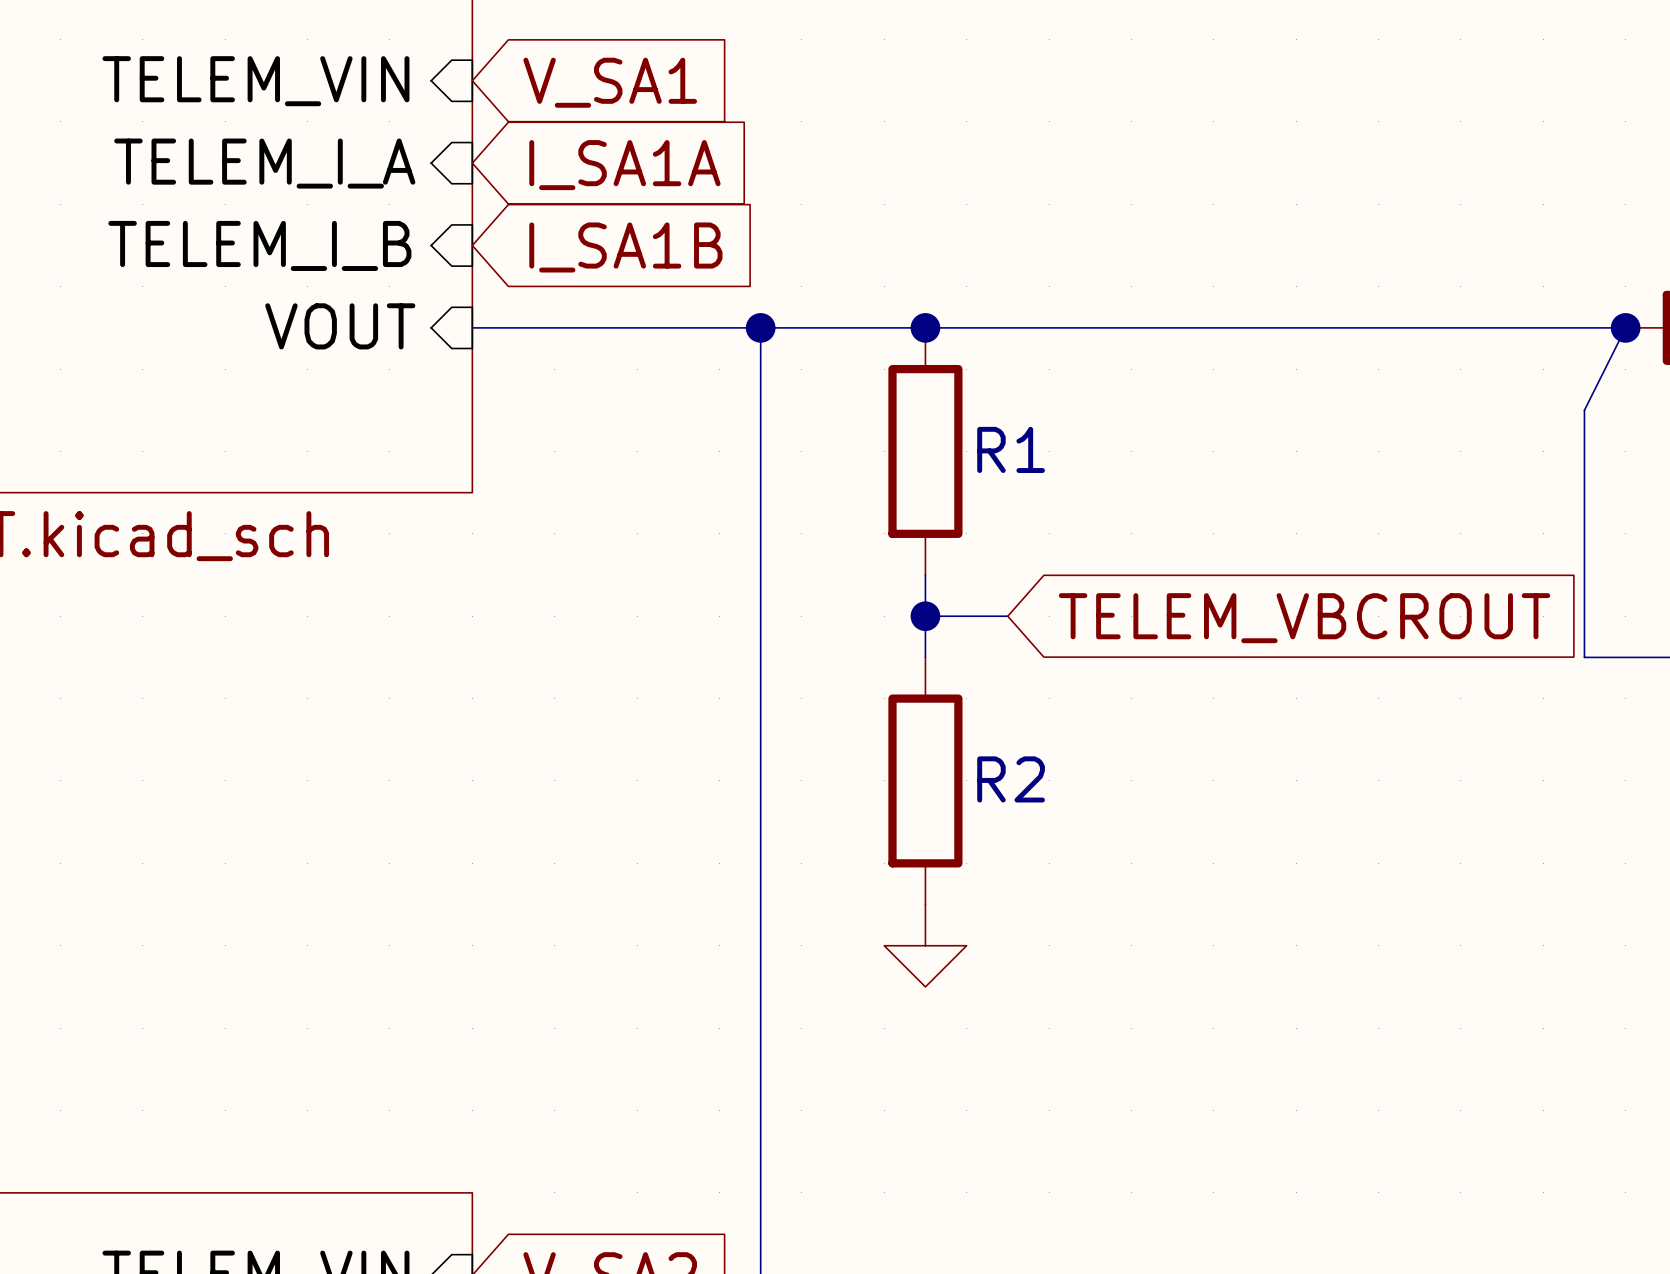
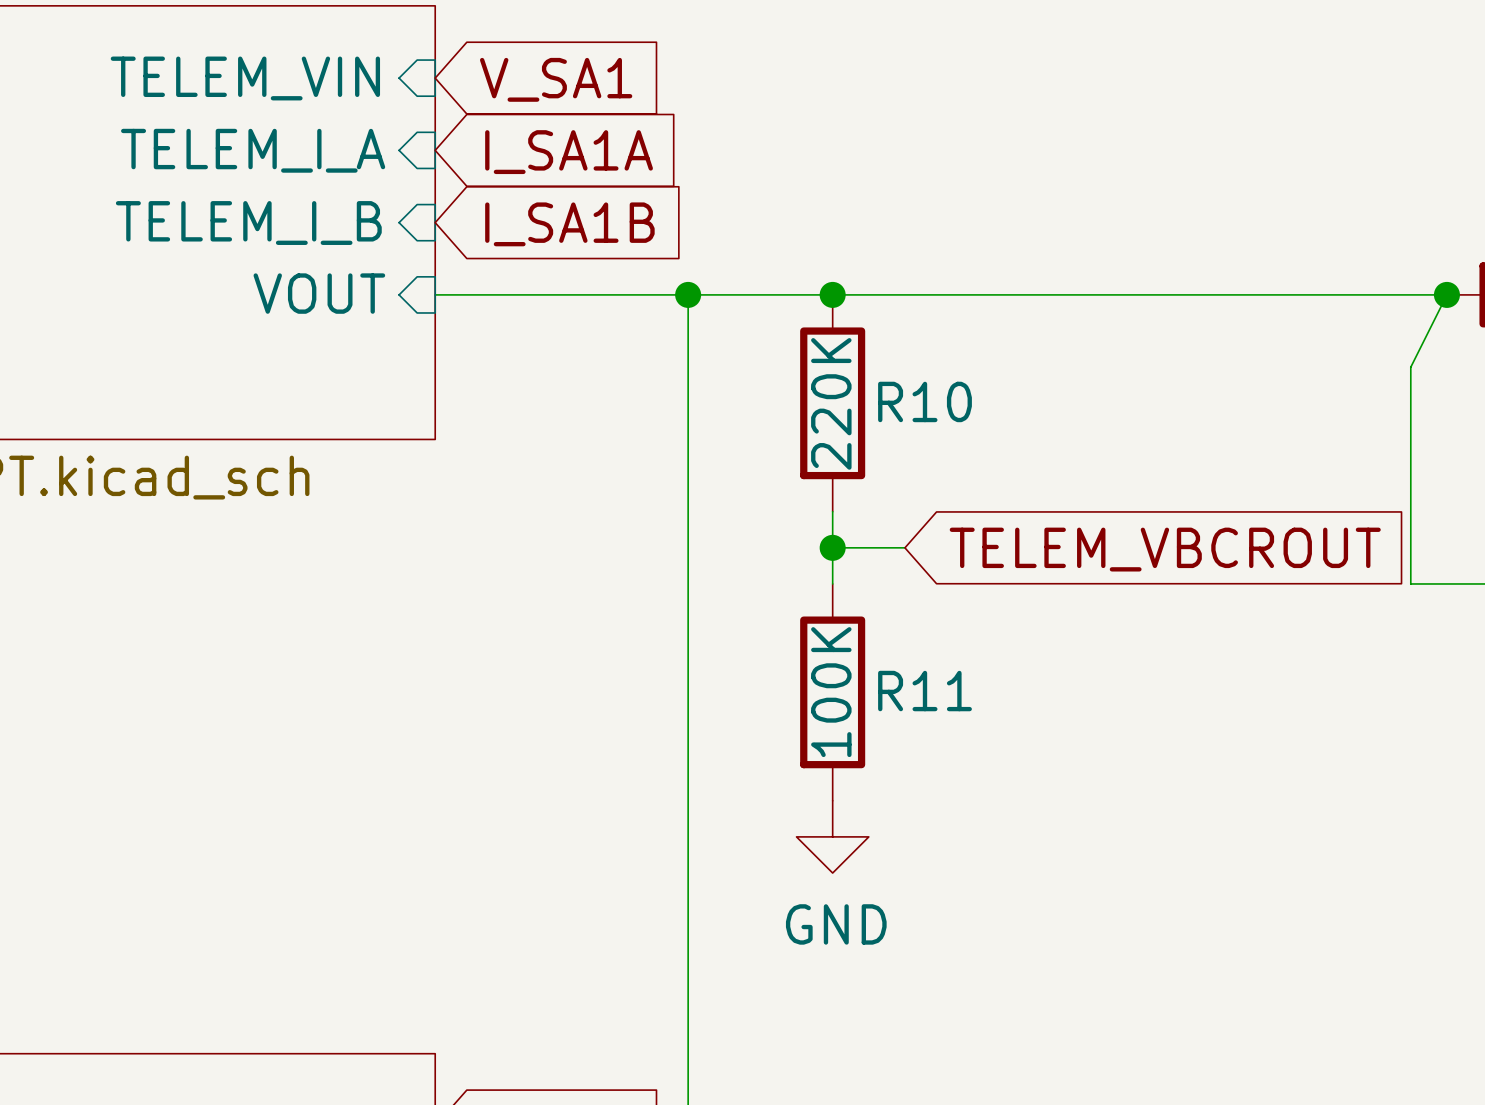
R1 name: R1 (1011, 449) -> R10 (925, 401)
R1 value: none -> 220K (831, 403)
R2 name: R2 (1011, 779) -> R11 (925, 691)
R2 value: none -> 100K (831, 692)
power symbol text: none -> GND (836, 924)

